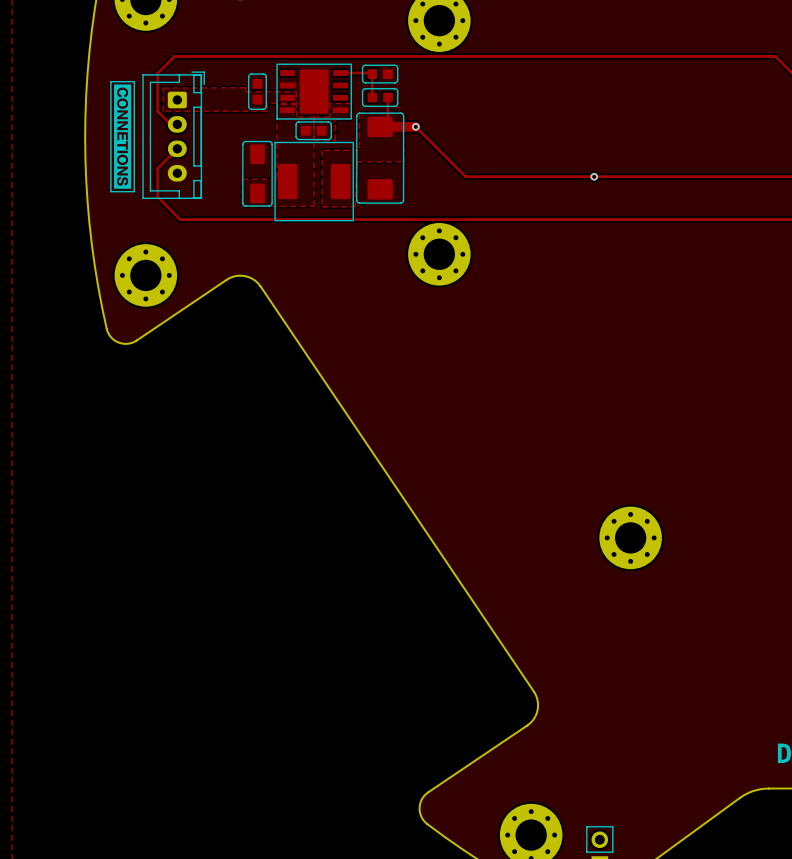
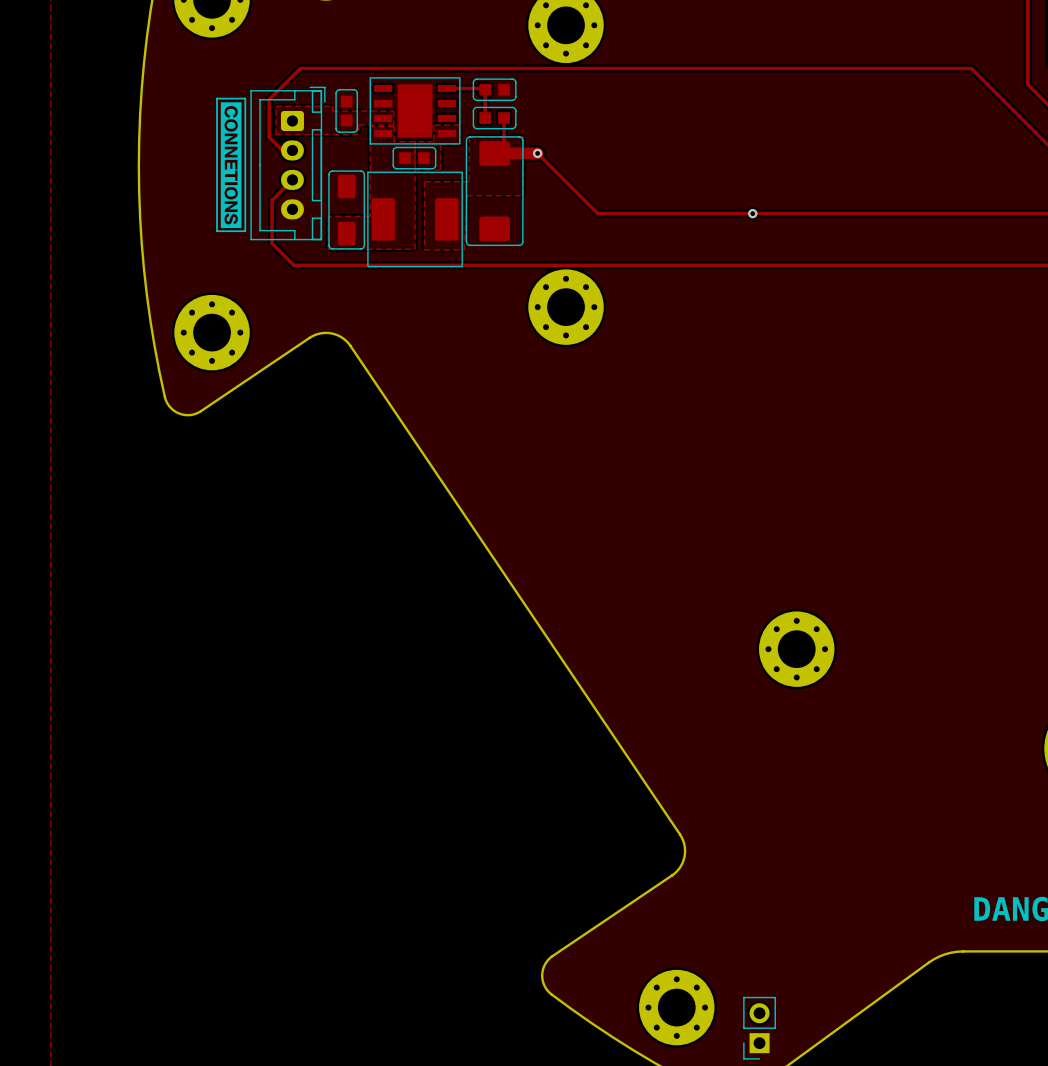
track: (218, 56) (174, 56) (157, 73) (157, 111) (170, 124) (177, 124) -> (300, 68) (269, 99) (269, 137) (282, 150) (292, 150)
line: (110, 81) (110, 191) (134, 191) (134, 81) (110, 81) -> (217, 98) (217, 231) (245, 231) (245, 98) (217, 98)
zone outline: (245, 87) (163, 88) (163, 111) (267, 111) -> (332, 106) (275, 106) (275, 134) (358, 134)
part position: (173, 135) -> (287, 163)
drawing position: (122, 136) -> (231, 165)
track: (177, 148) (157, 168) (157, 197) (180, 219) (213, 219) -> (292, 179) (272, 200) (272, 243) (293, 265)

